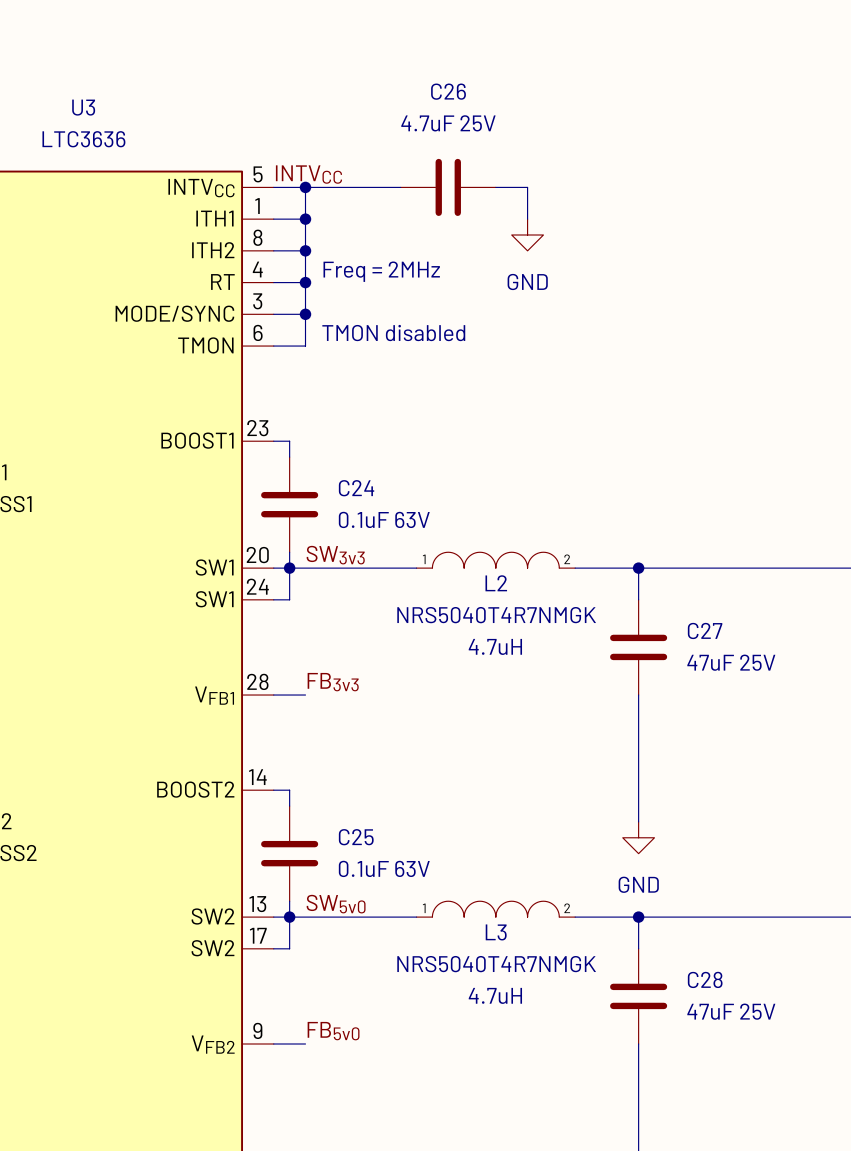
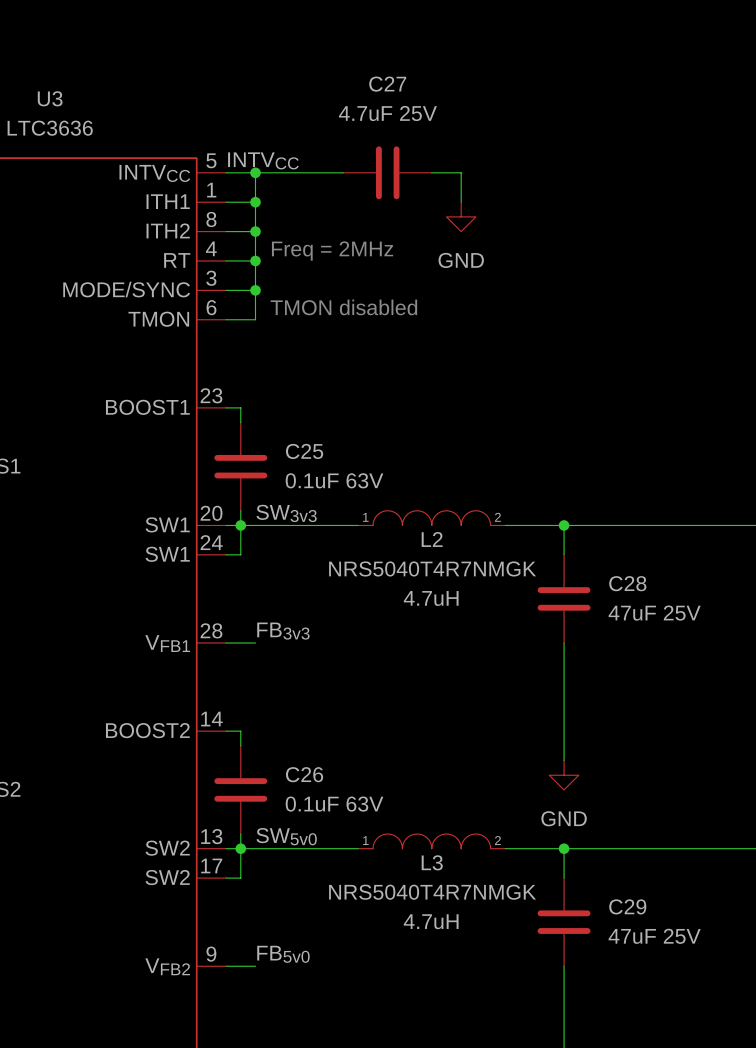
C26 name: C26 (448, 91) -> C27 (387, 84)
C24 name: C24 (356, 488) -> C25 (304, 451)
C27 name: C27 (705, 630) -> C28 (627, 583)
C25 name: C25 (356, 837) -> C26 (304, 774)
C28 name: C28 (705, 979) -> C29 (627, 906)

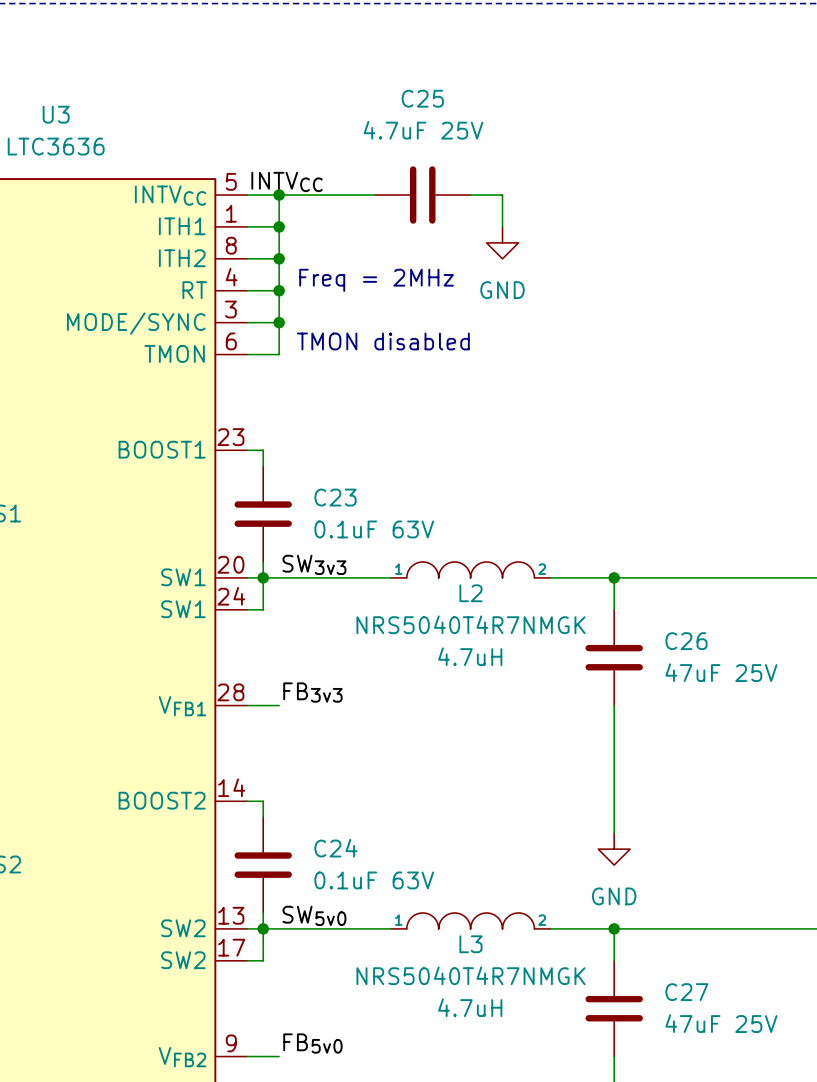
C27 name: C27 (387, 84) -> C25 (422, 98)
C25 name: C25 (304, 451) -> C23 (335, 497)
C28 name: C28 (627, 583) -> C26 (686, 641)
C26 name: C26 (304, 774) -> C24 (335, 848)
C29 name: C29 (627, 906) -> C27 (686, 992)

